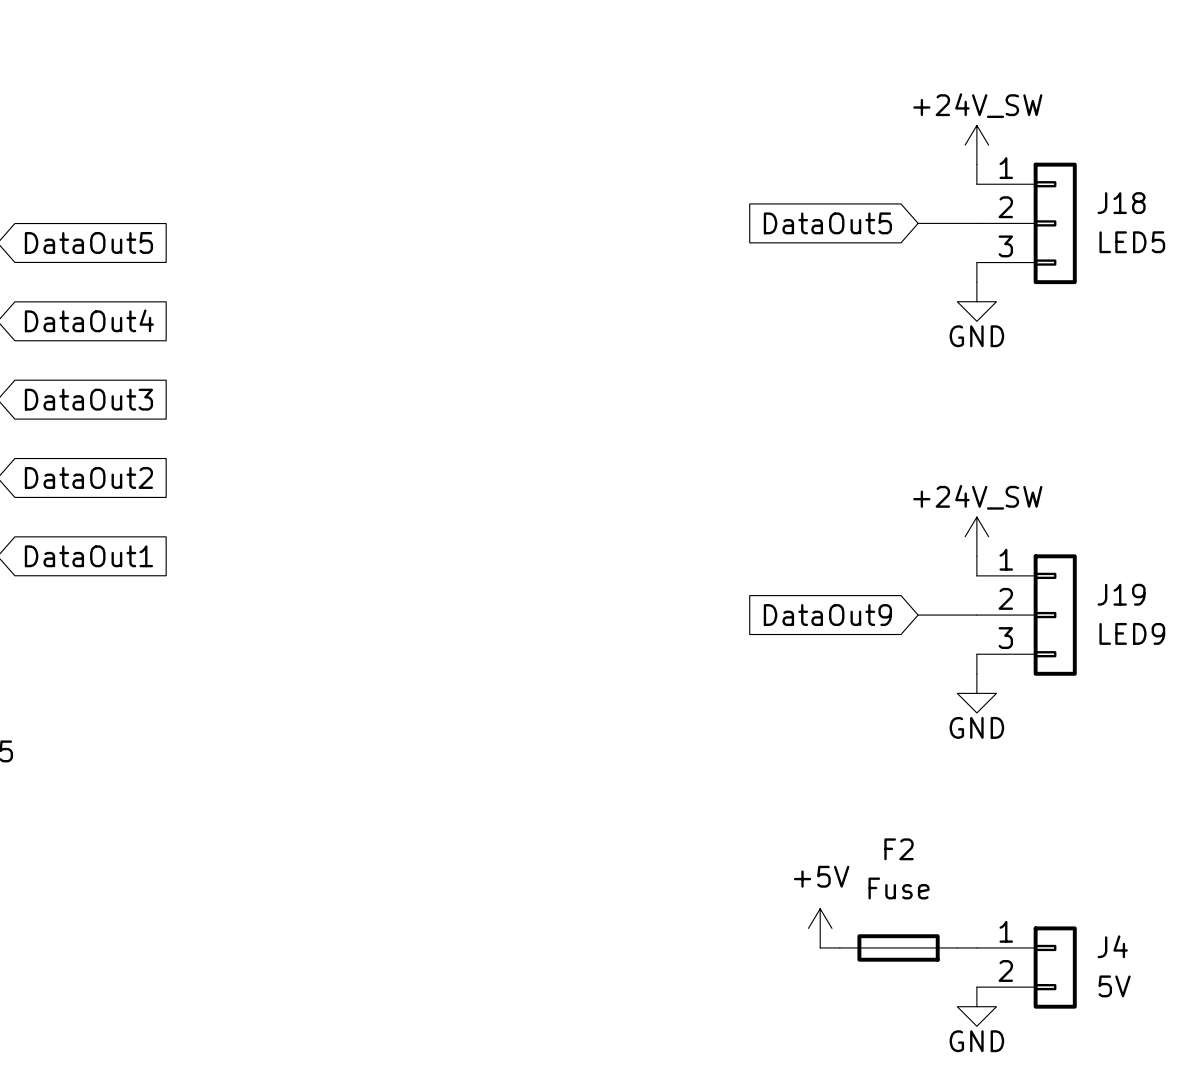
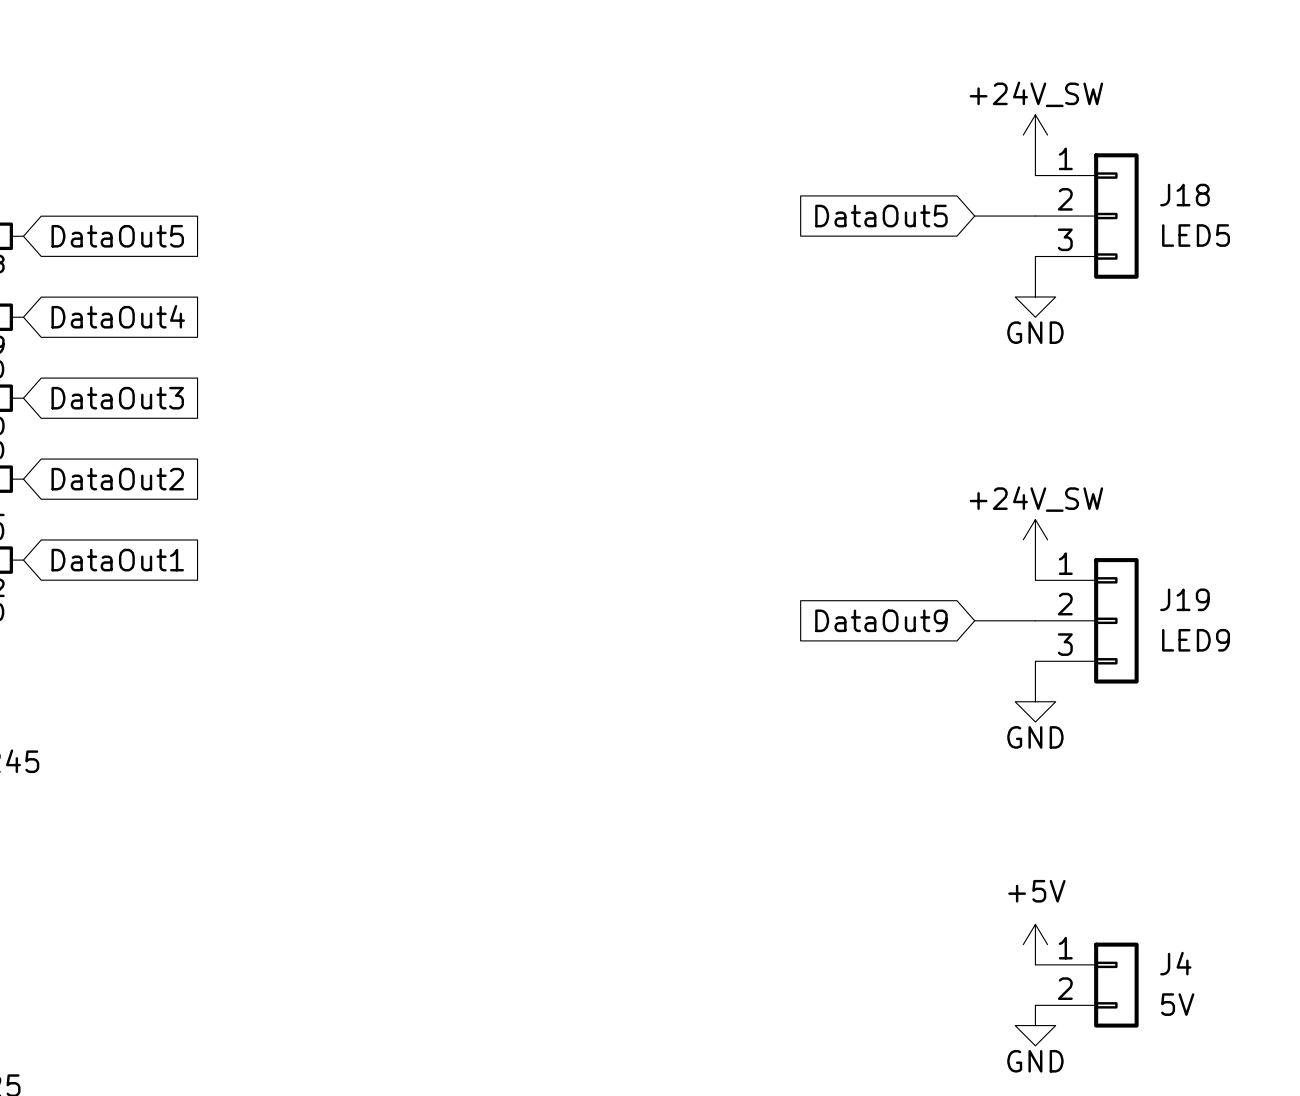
power symbol position: +5V (820, 928) -> +5V (1035, 944)
wire: (820, 947) (839, 947) -> none
F2: Fuse (898, 947) -> none
wire: (957, 947) (976, 947) -> none

